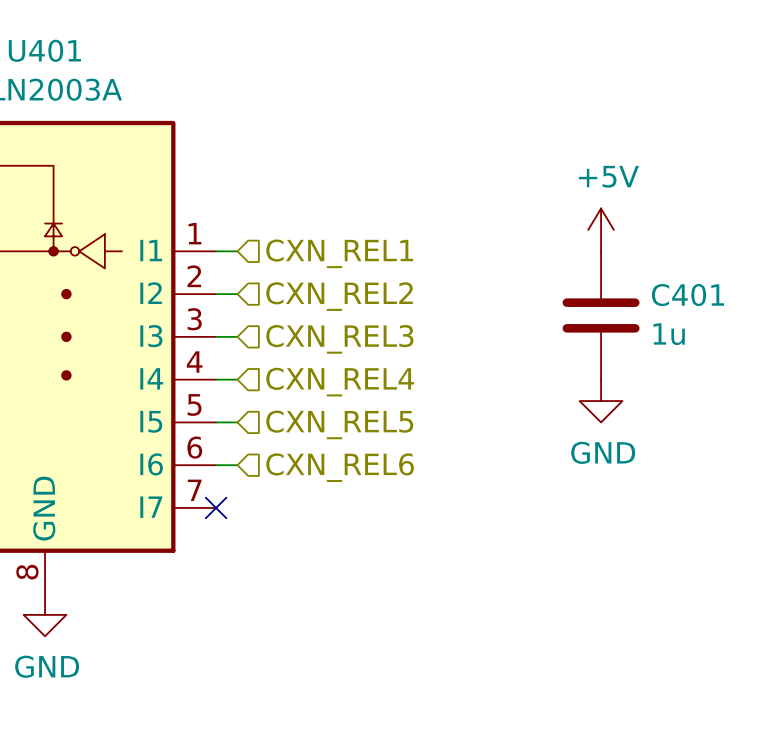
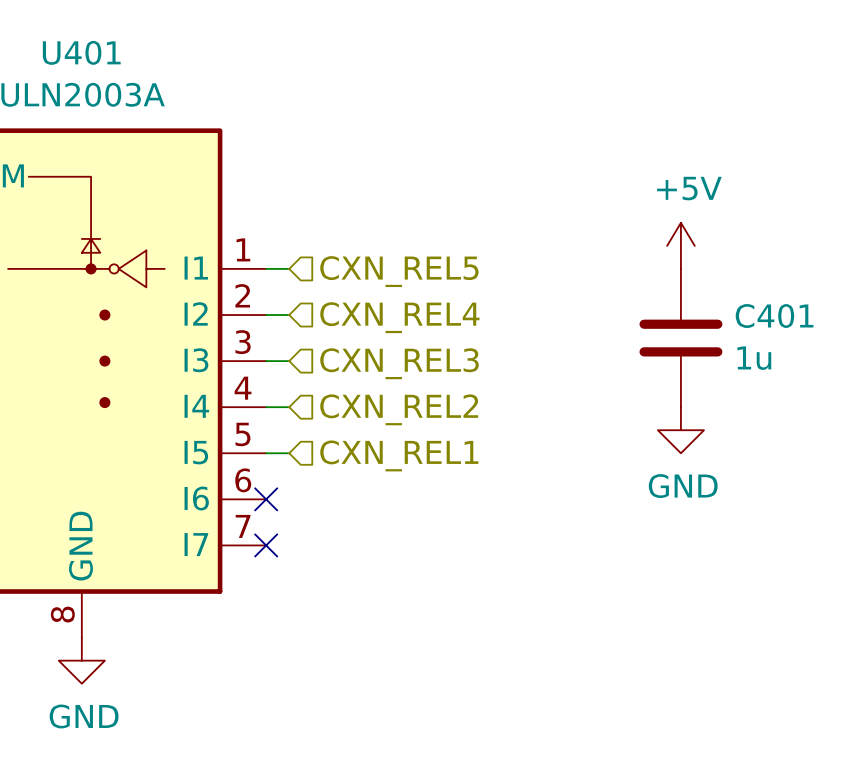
hierarchical label: CXN_REL1 (339, 253) -> CXN_REL5 (399, 271)
hierarchical label: CXN_REL2 (339, 296) -> CXN_REL4 (399, 317)
hierarchical label: CXN_REL4 (340, 382) -> CXN_REL2 (399, 409)
hierarchical label: CXN_REL5 (339, 424) -> CXN_REL1 (399, 455)
wire: (216, 465) (237, 465) -> none
no-connect mark: none -> (266, 499)
hierarchical label: CXN_REL6 (340, 467) -> none

